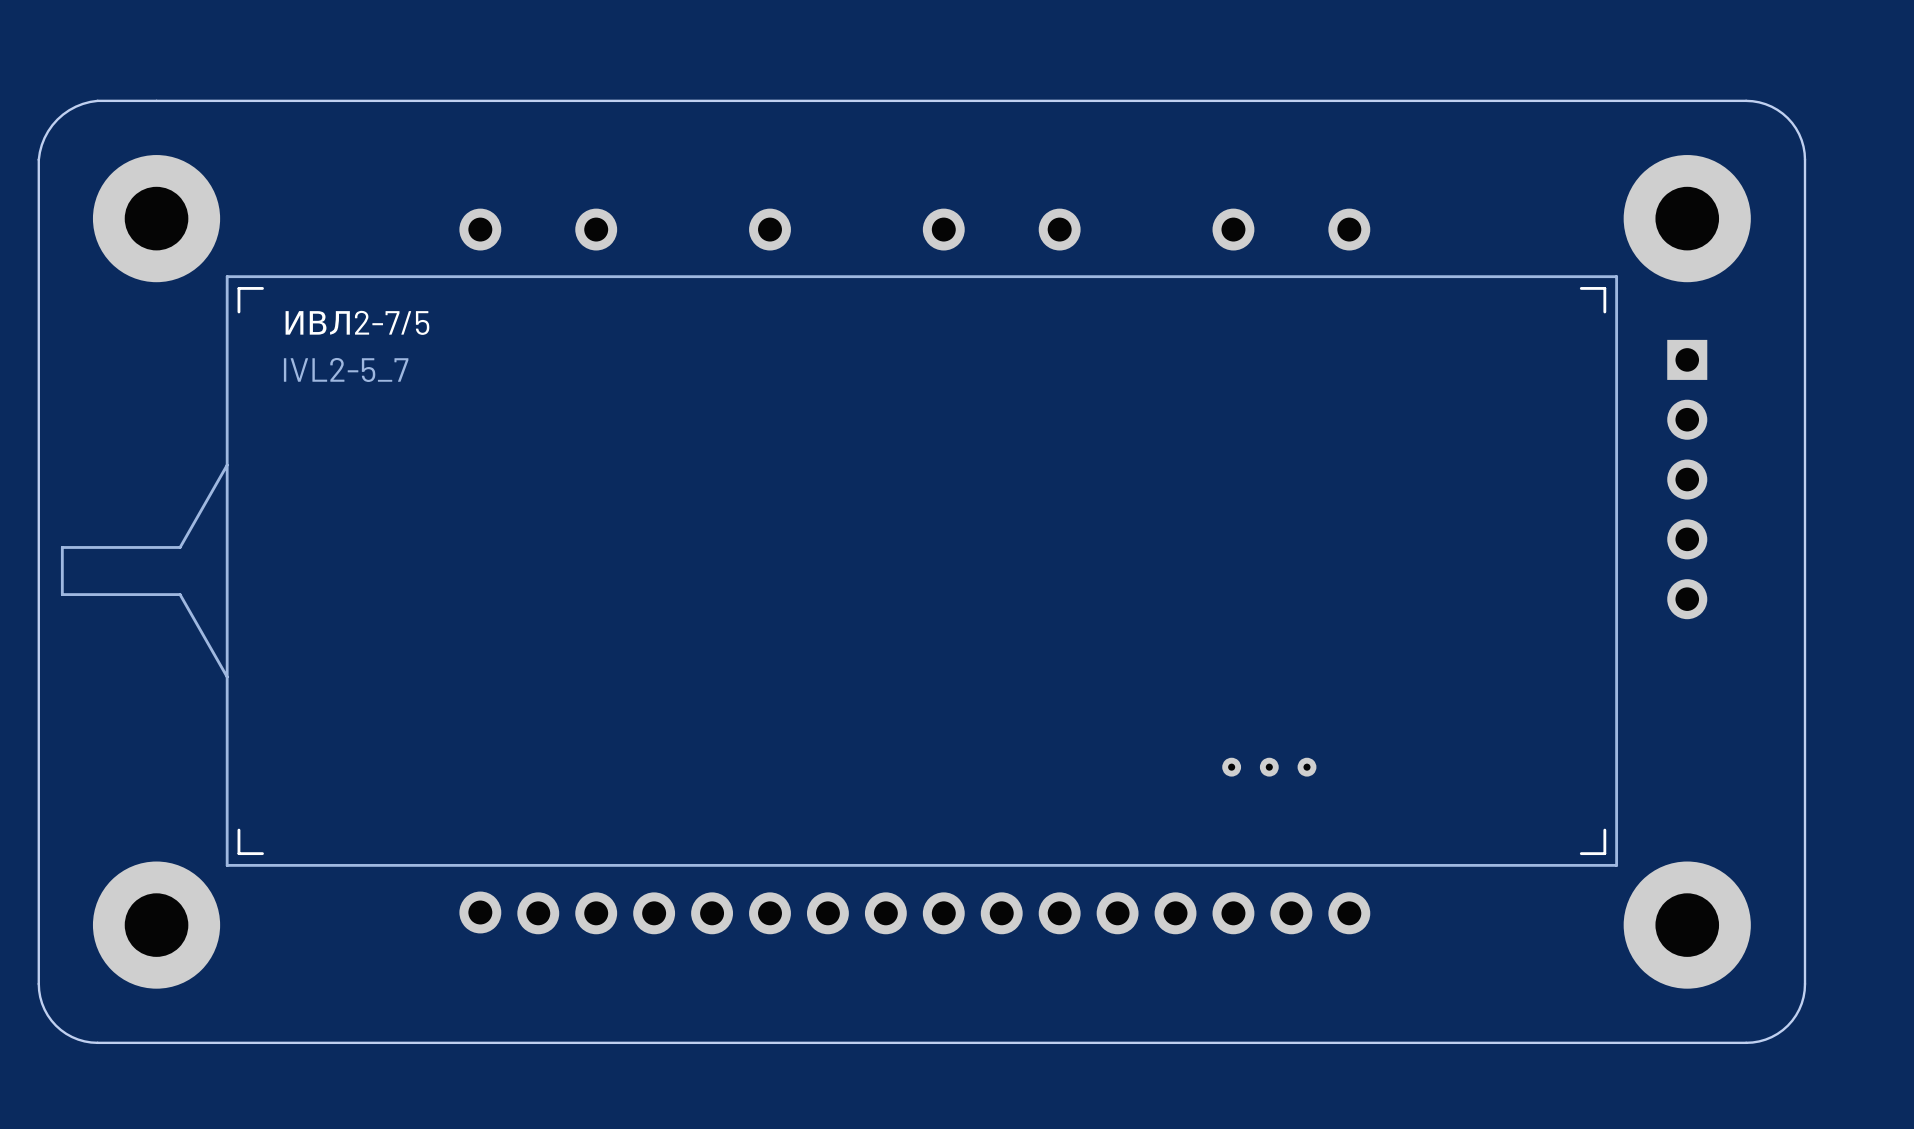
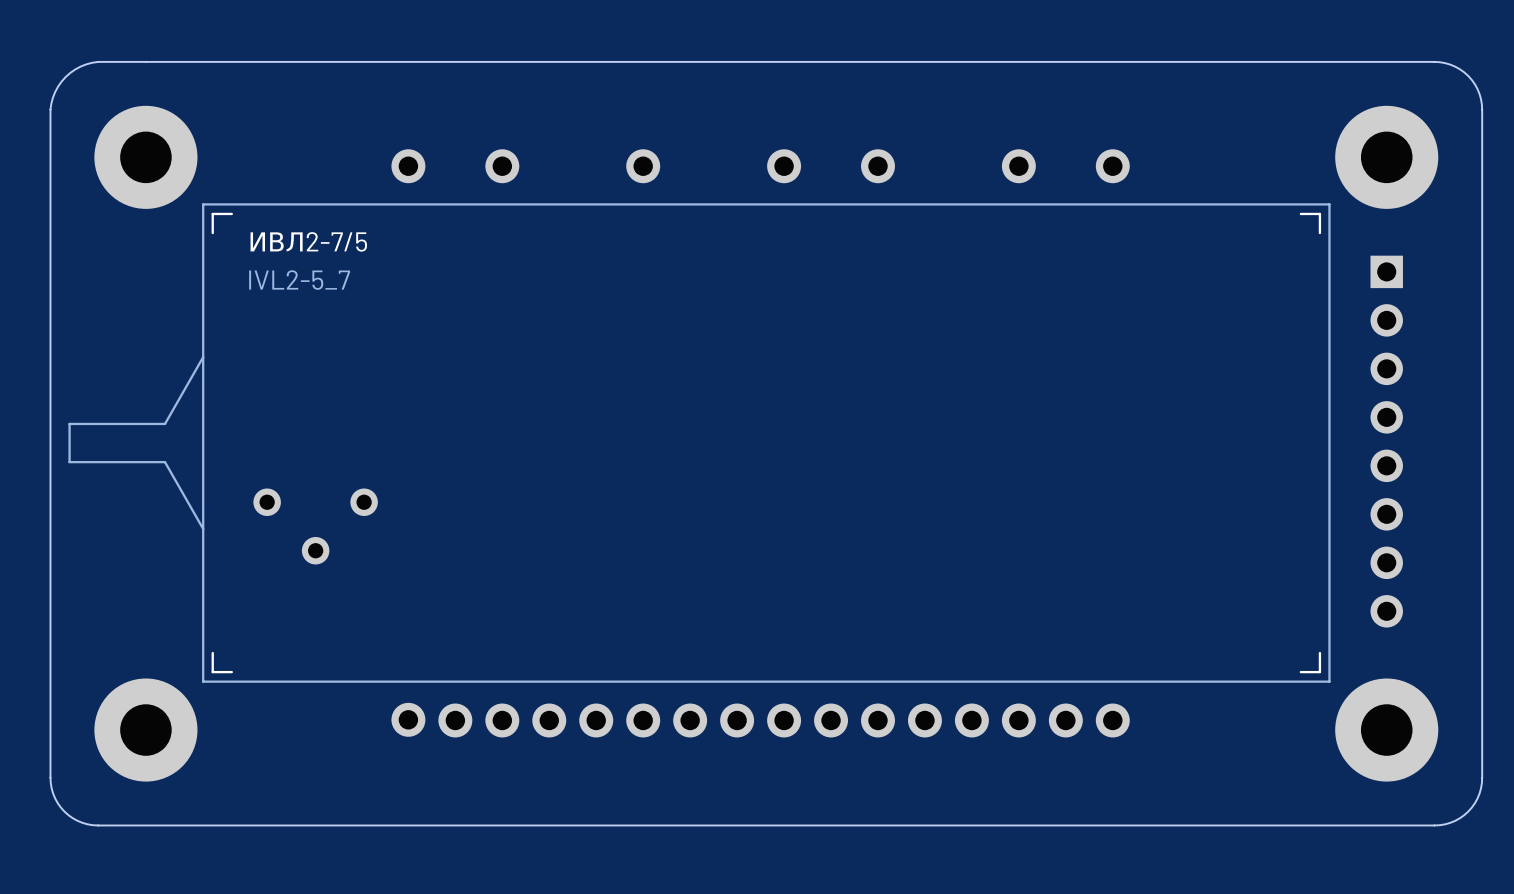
part: none -> (1386, 441)
part: none -> (315, 526)
part: (1269, 767) -> none

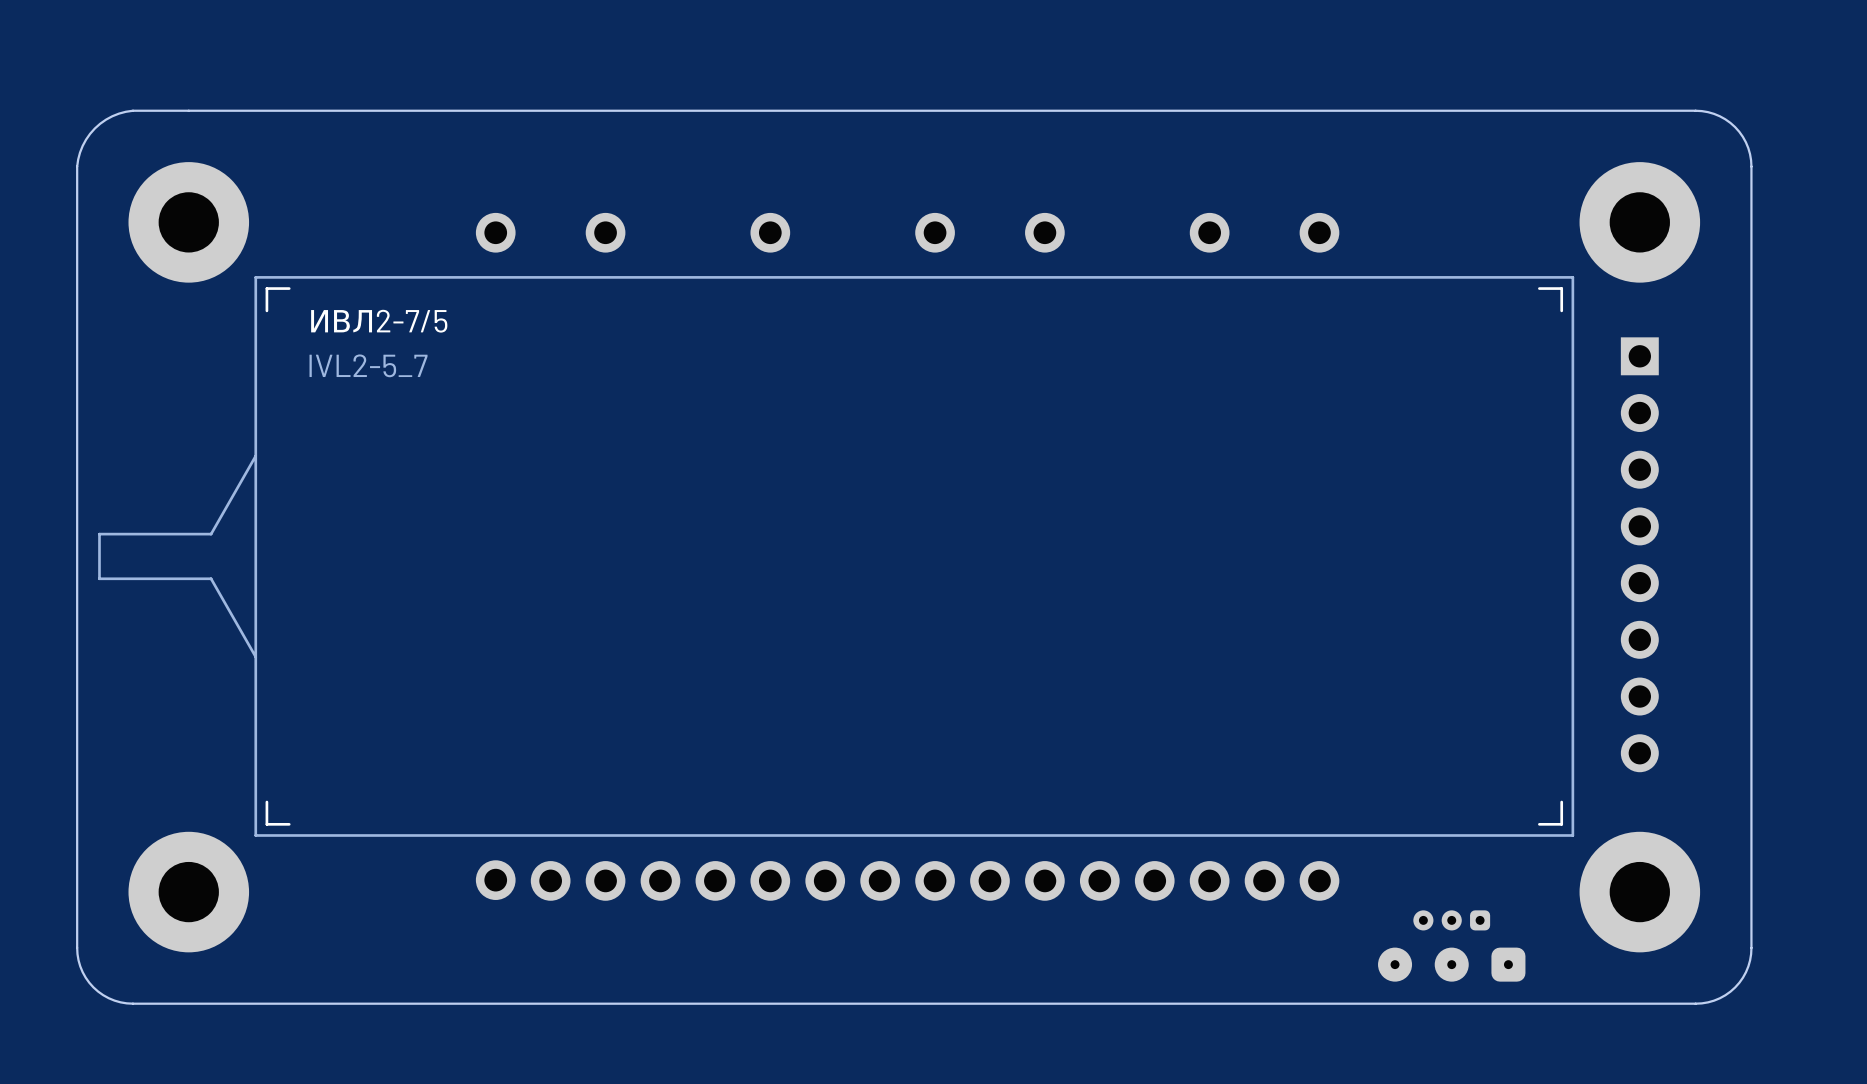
part: (315, 526) -> none
part: none -> (1451, 920)
part: none -> (1451, 964)

